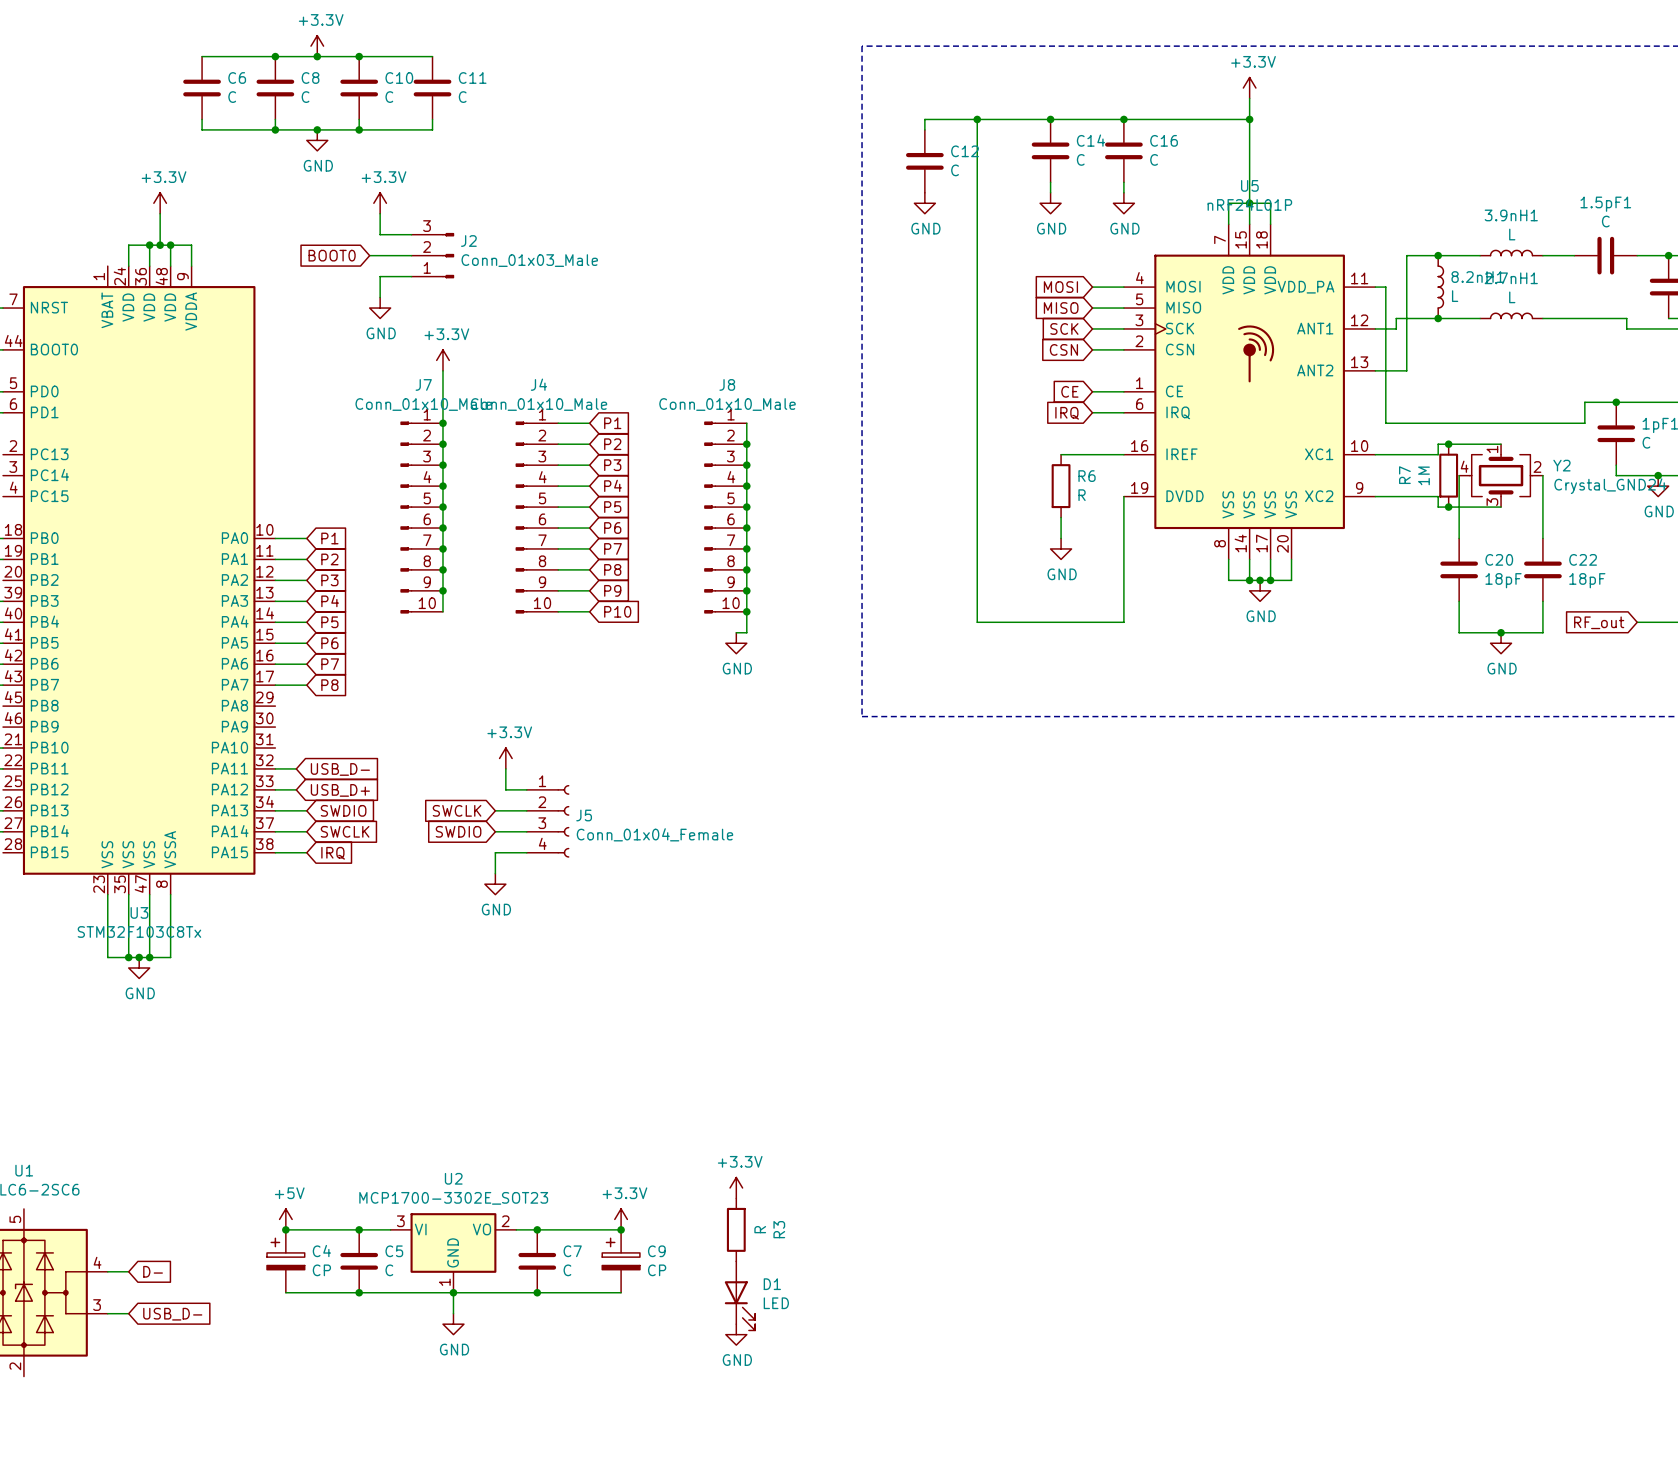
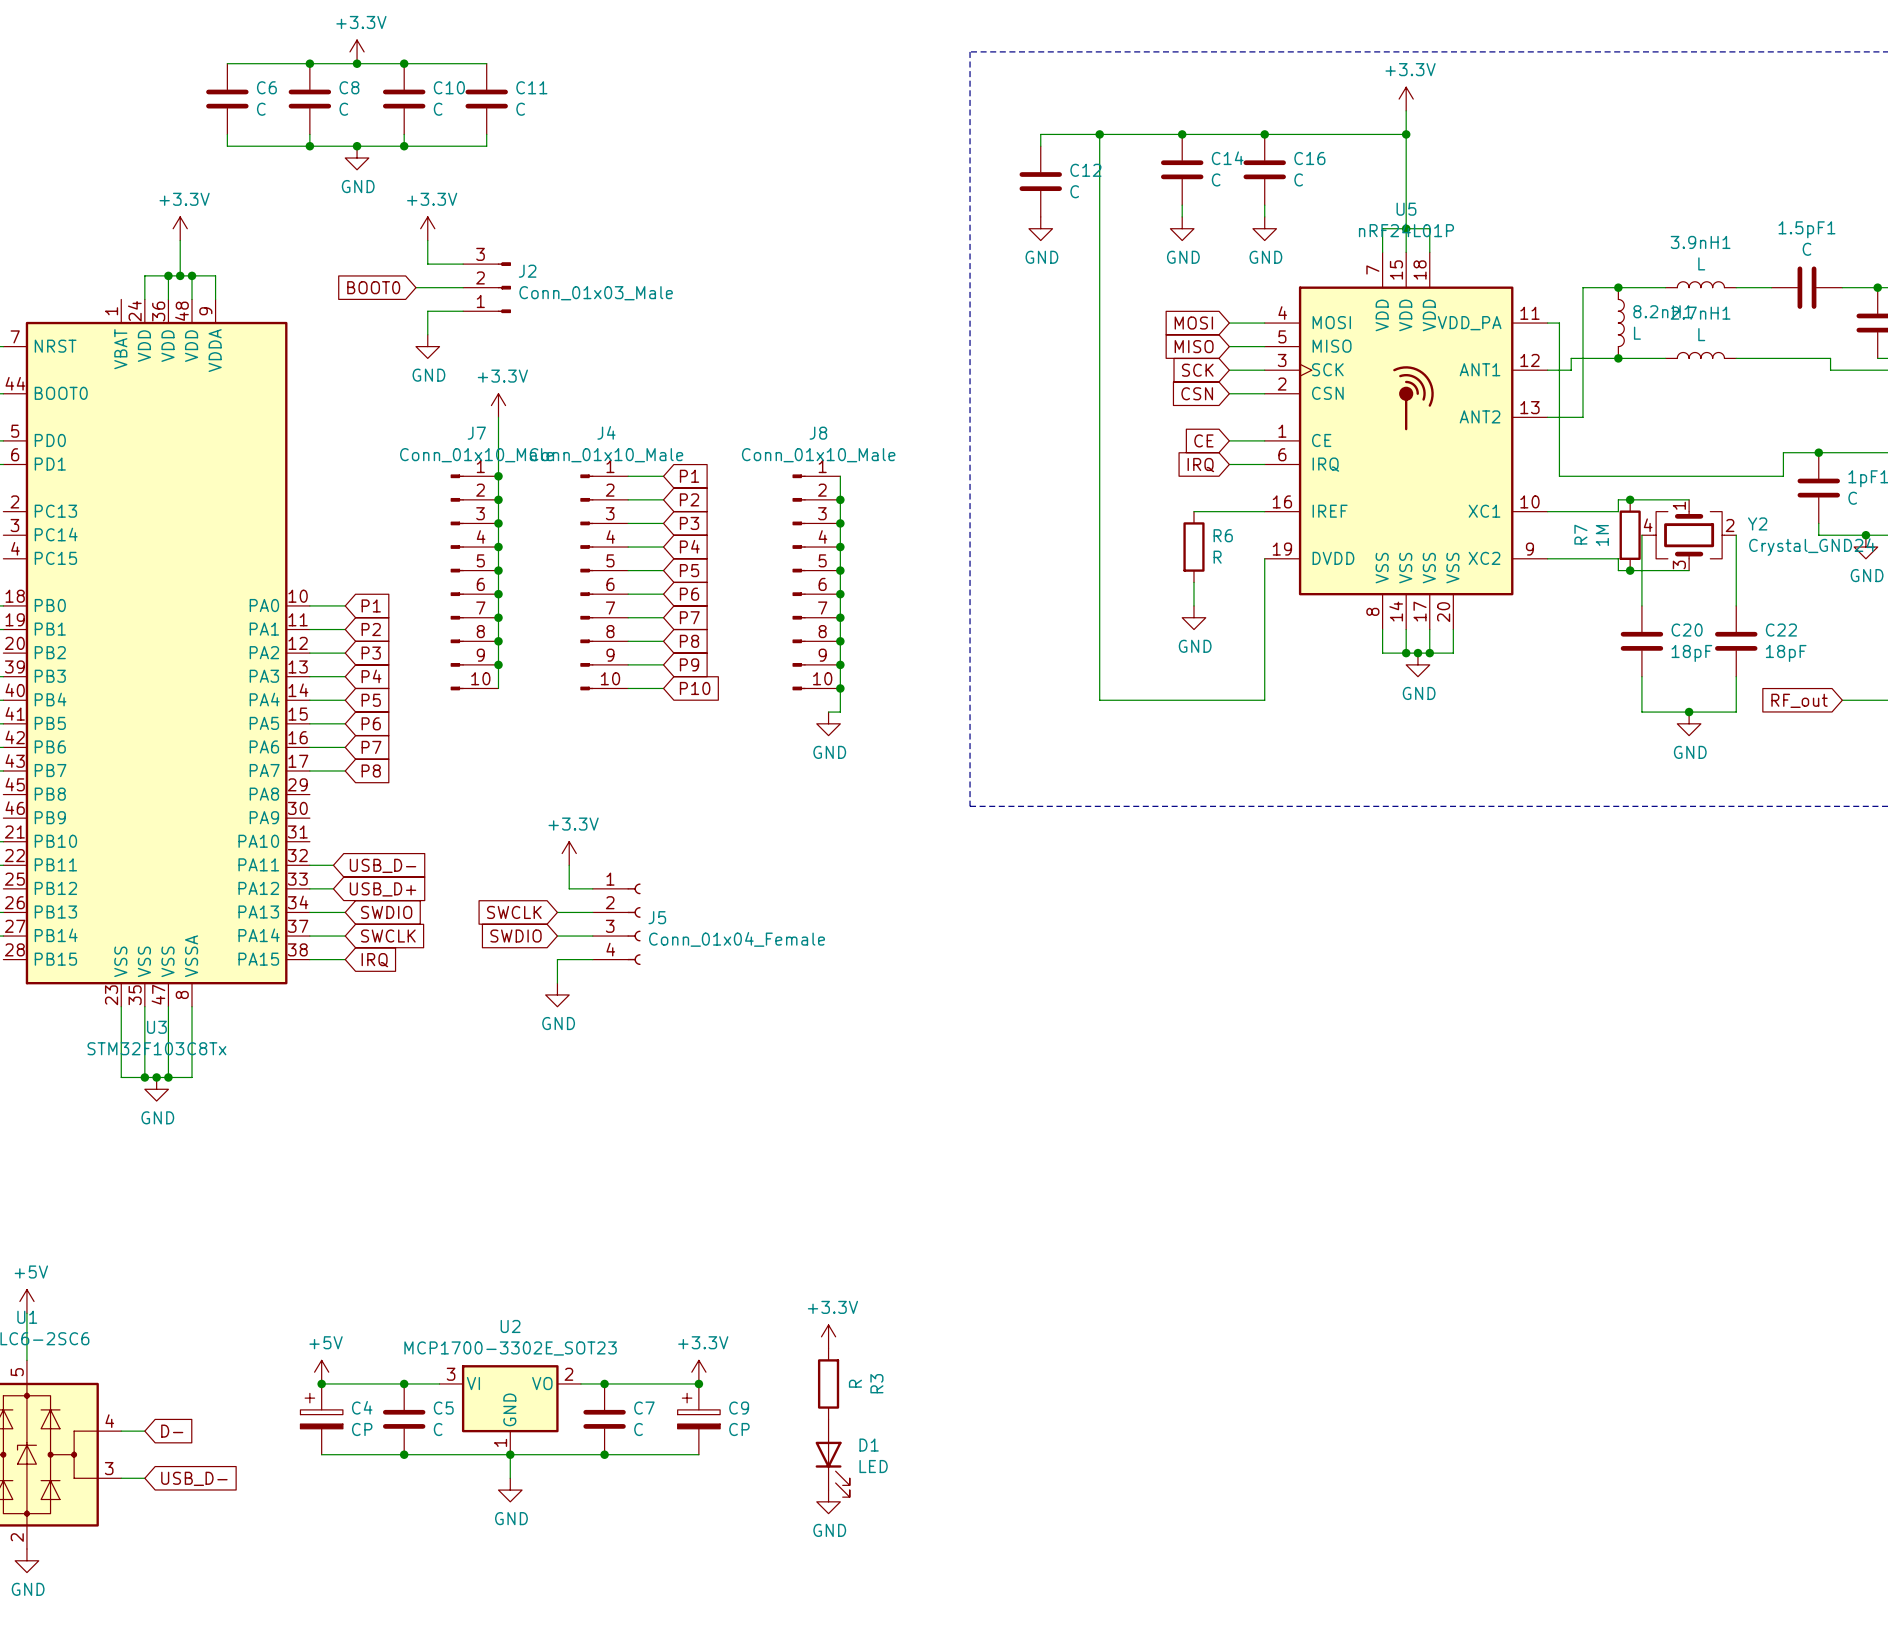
power symbol: none -> +5V (26, 1301)
wire: none -> (26, 1313) (26, 1360)
power symbol: none -> GND (26, 1560)

